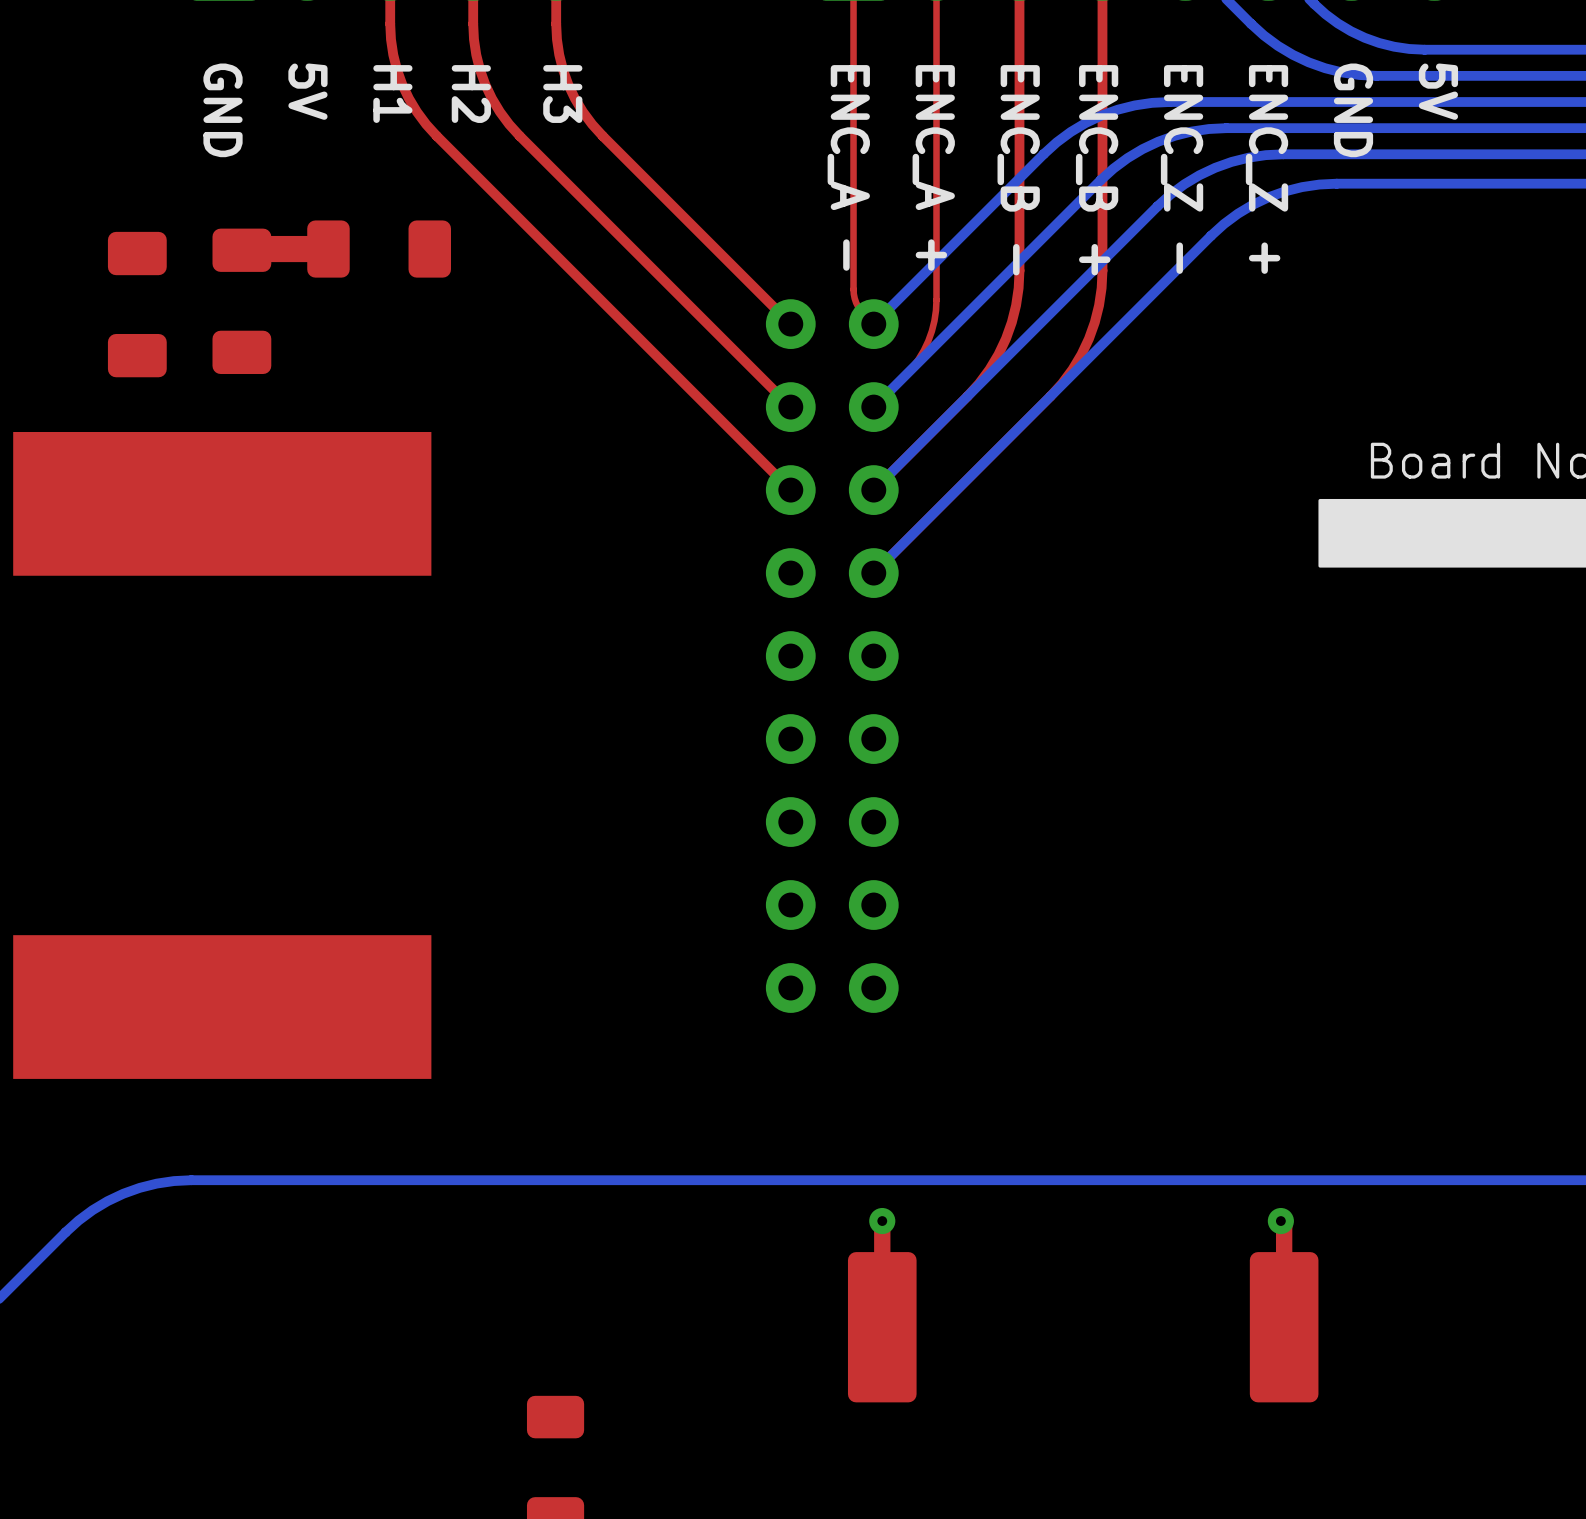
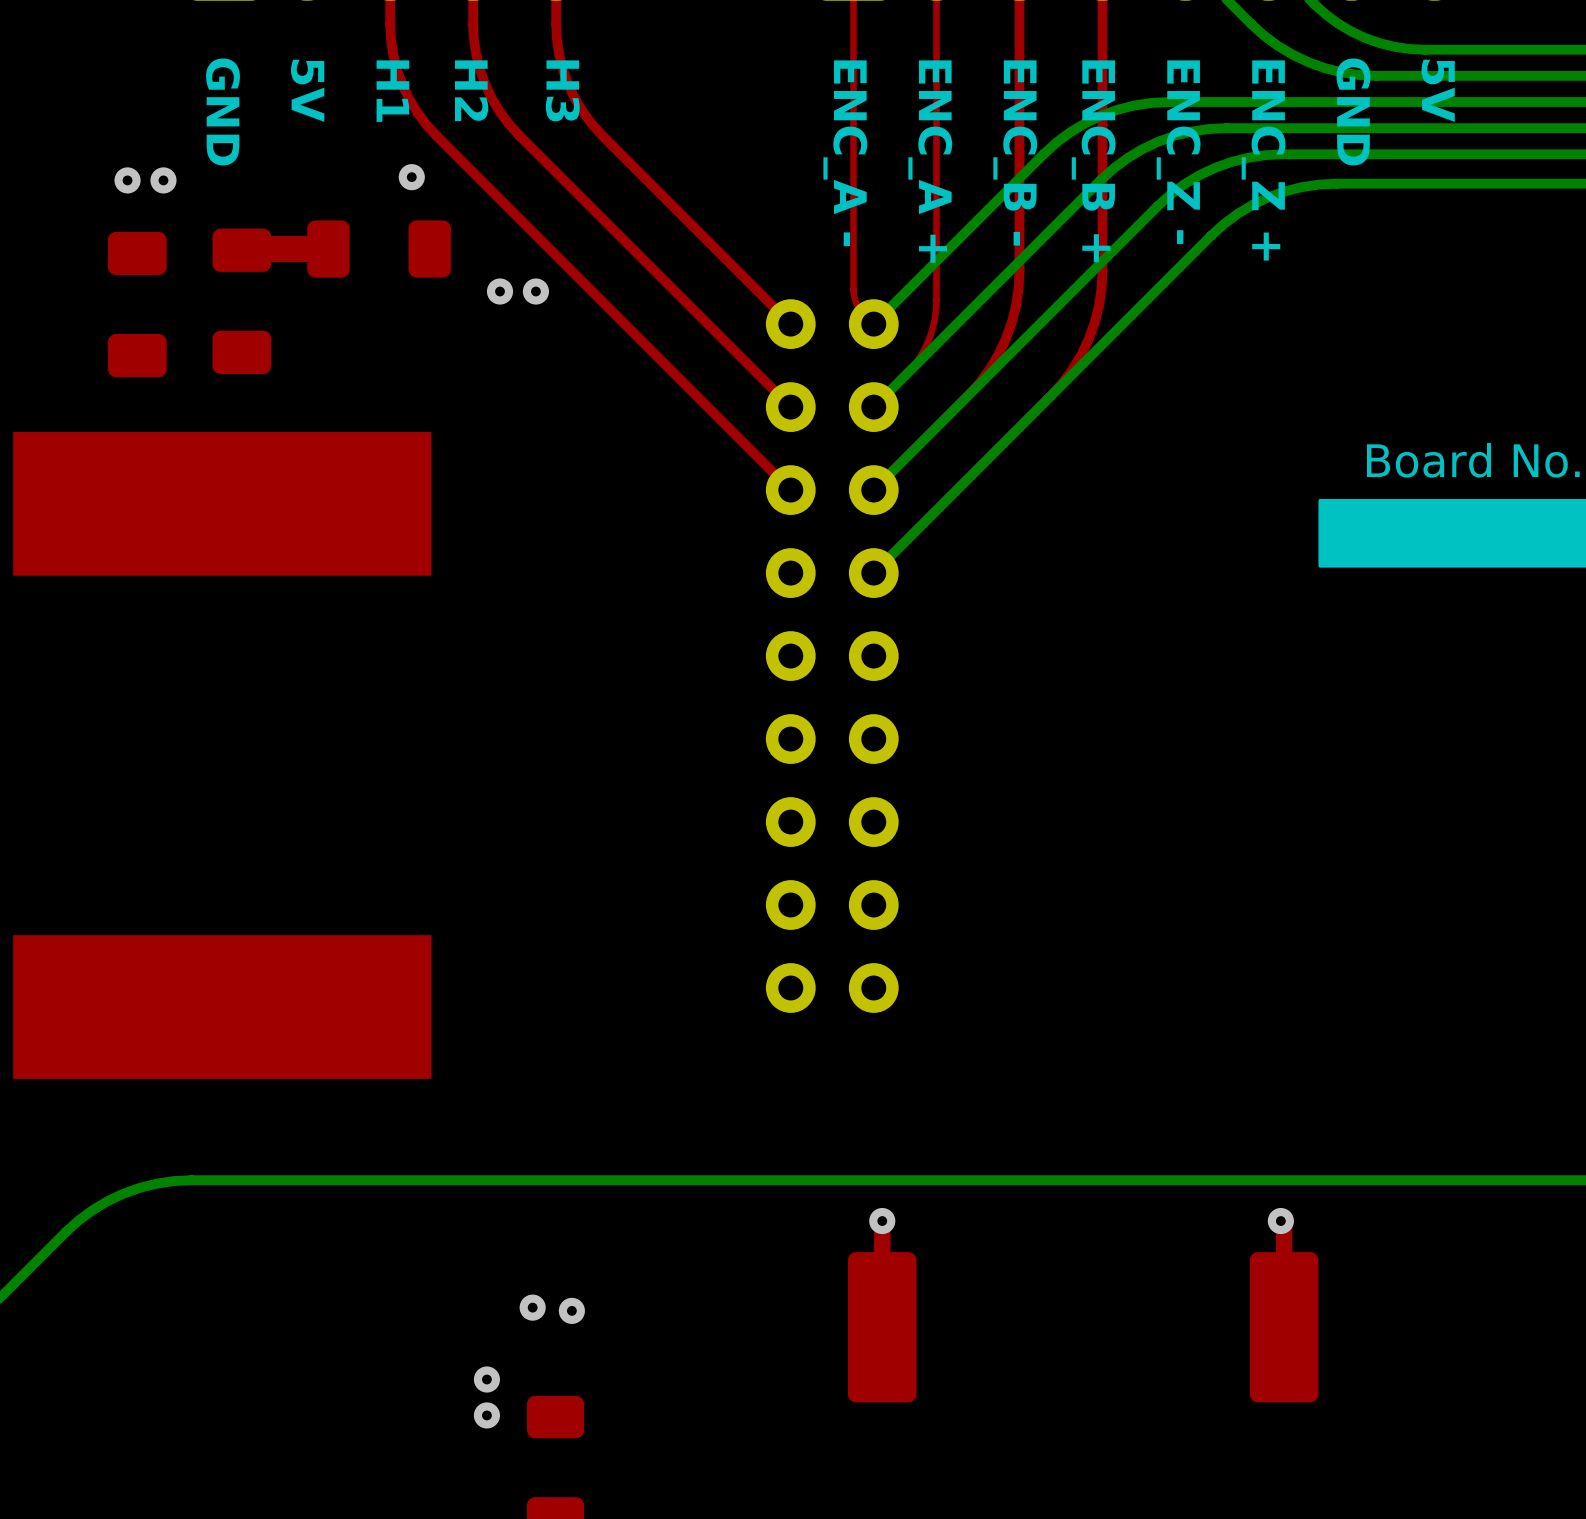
via: none -> (411, 177)
via: none -> (127, 180)
via: none -> (163, 180)
via: none -> (500, 291)
via: none -> (535, 291)
via: none -> (532, 1307)
via: none -> (571, 1310)
via: none -> (486, 1379)
via: none -> (486, 1415)

